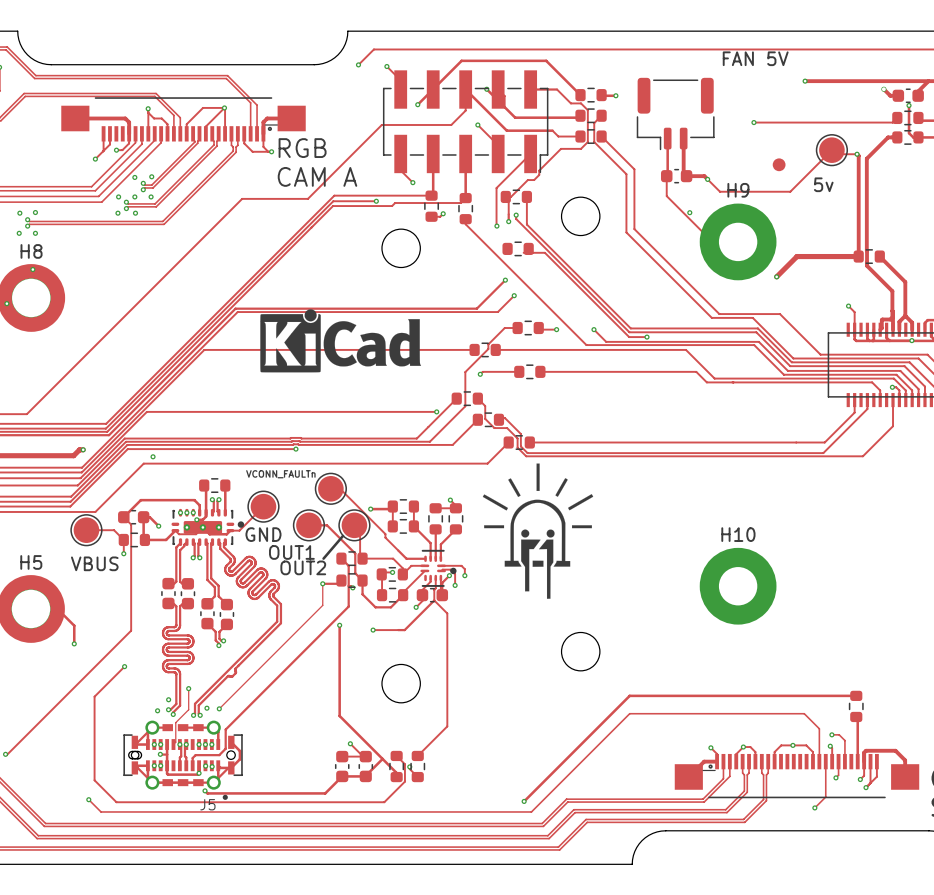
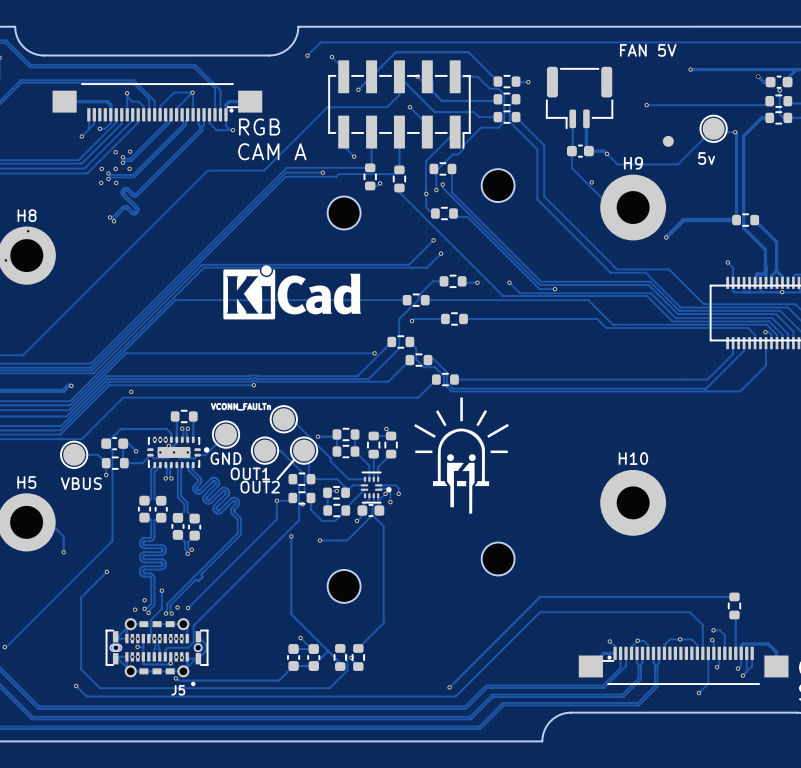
via: (35, 212) -> none
via: (19, 213) -> none
track: (27, 219) (29, 221) (162, 221) -> (110, 217) (124, 206) (135, 211) (135, 208) (121, 192) (125, 188) (134, 194) (139, 189)
via: (27, 219) -> none
track: (164, 224) (29, 224) (27, 226) -> (140, 192) (134, 196) (124, 191) (124, 194) (138, 207) (138, 211) (133, 214) (124, 208) (113, 221)
via: (27, 226) -> none
track: none -> (426, 193) (426, 207) (432, 213) (435, 213)
via: (19, 233) -> none
via: (35, 233) -> none
via: none -> (110, 217)
via: none -> (113, 221)

